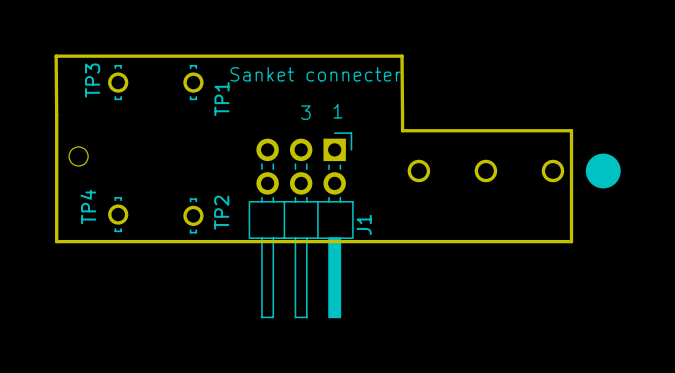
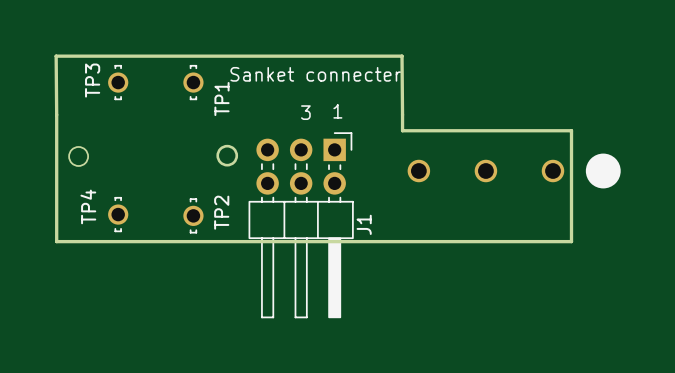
round board edge: none -> [216, 144, 239, 167]

